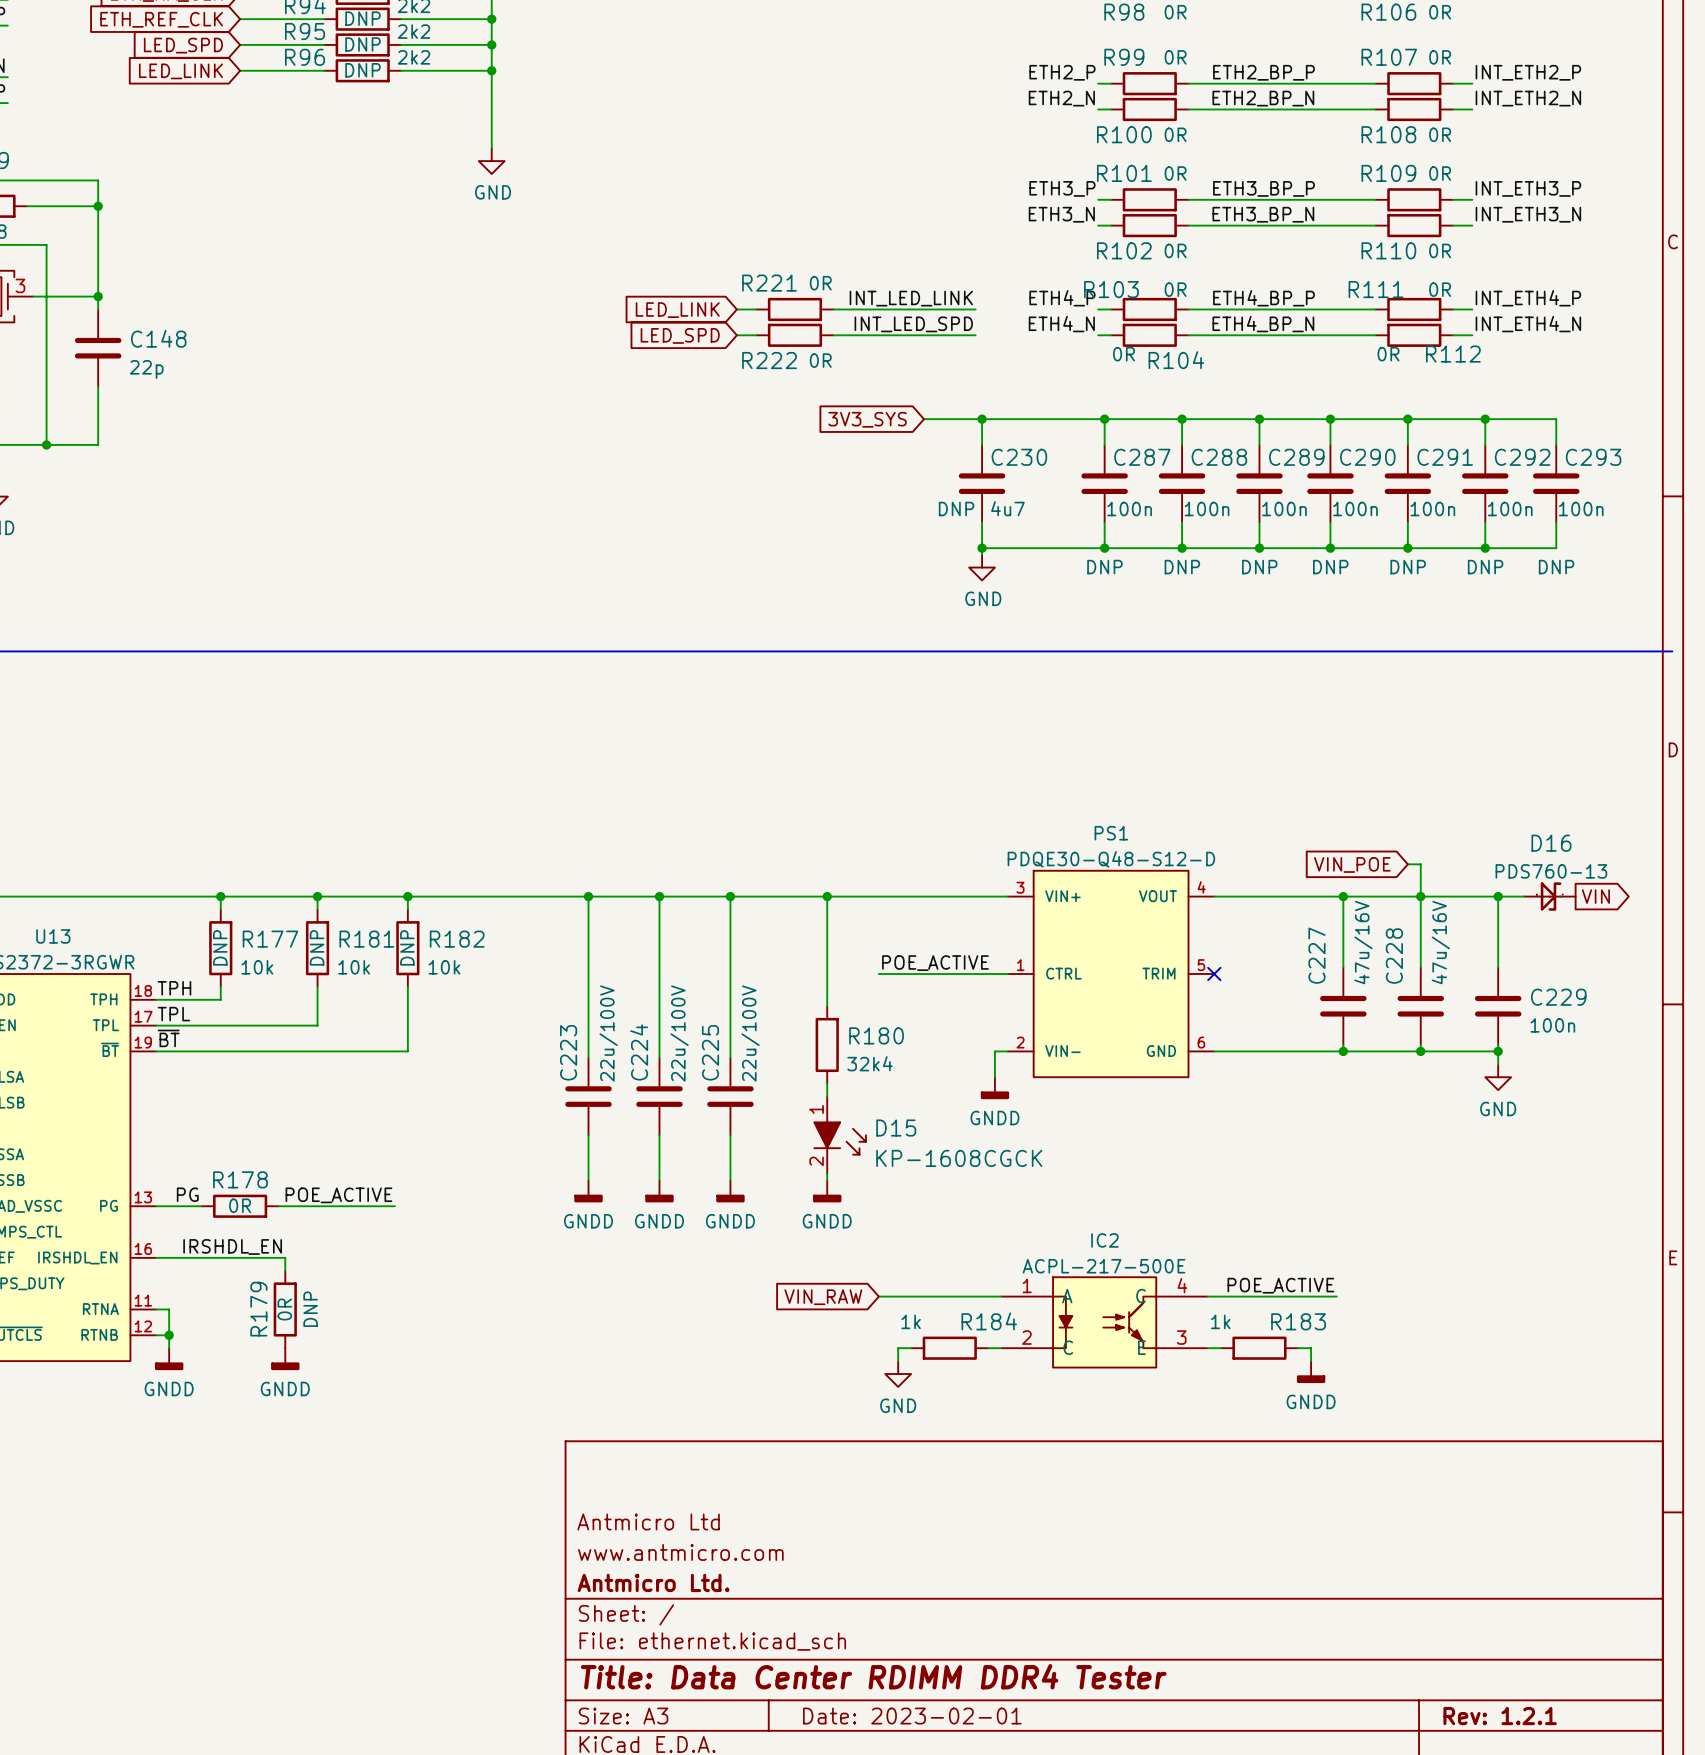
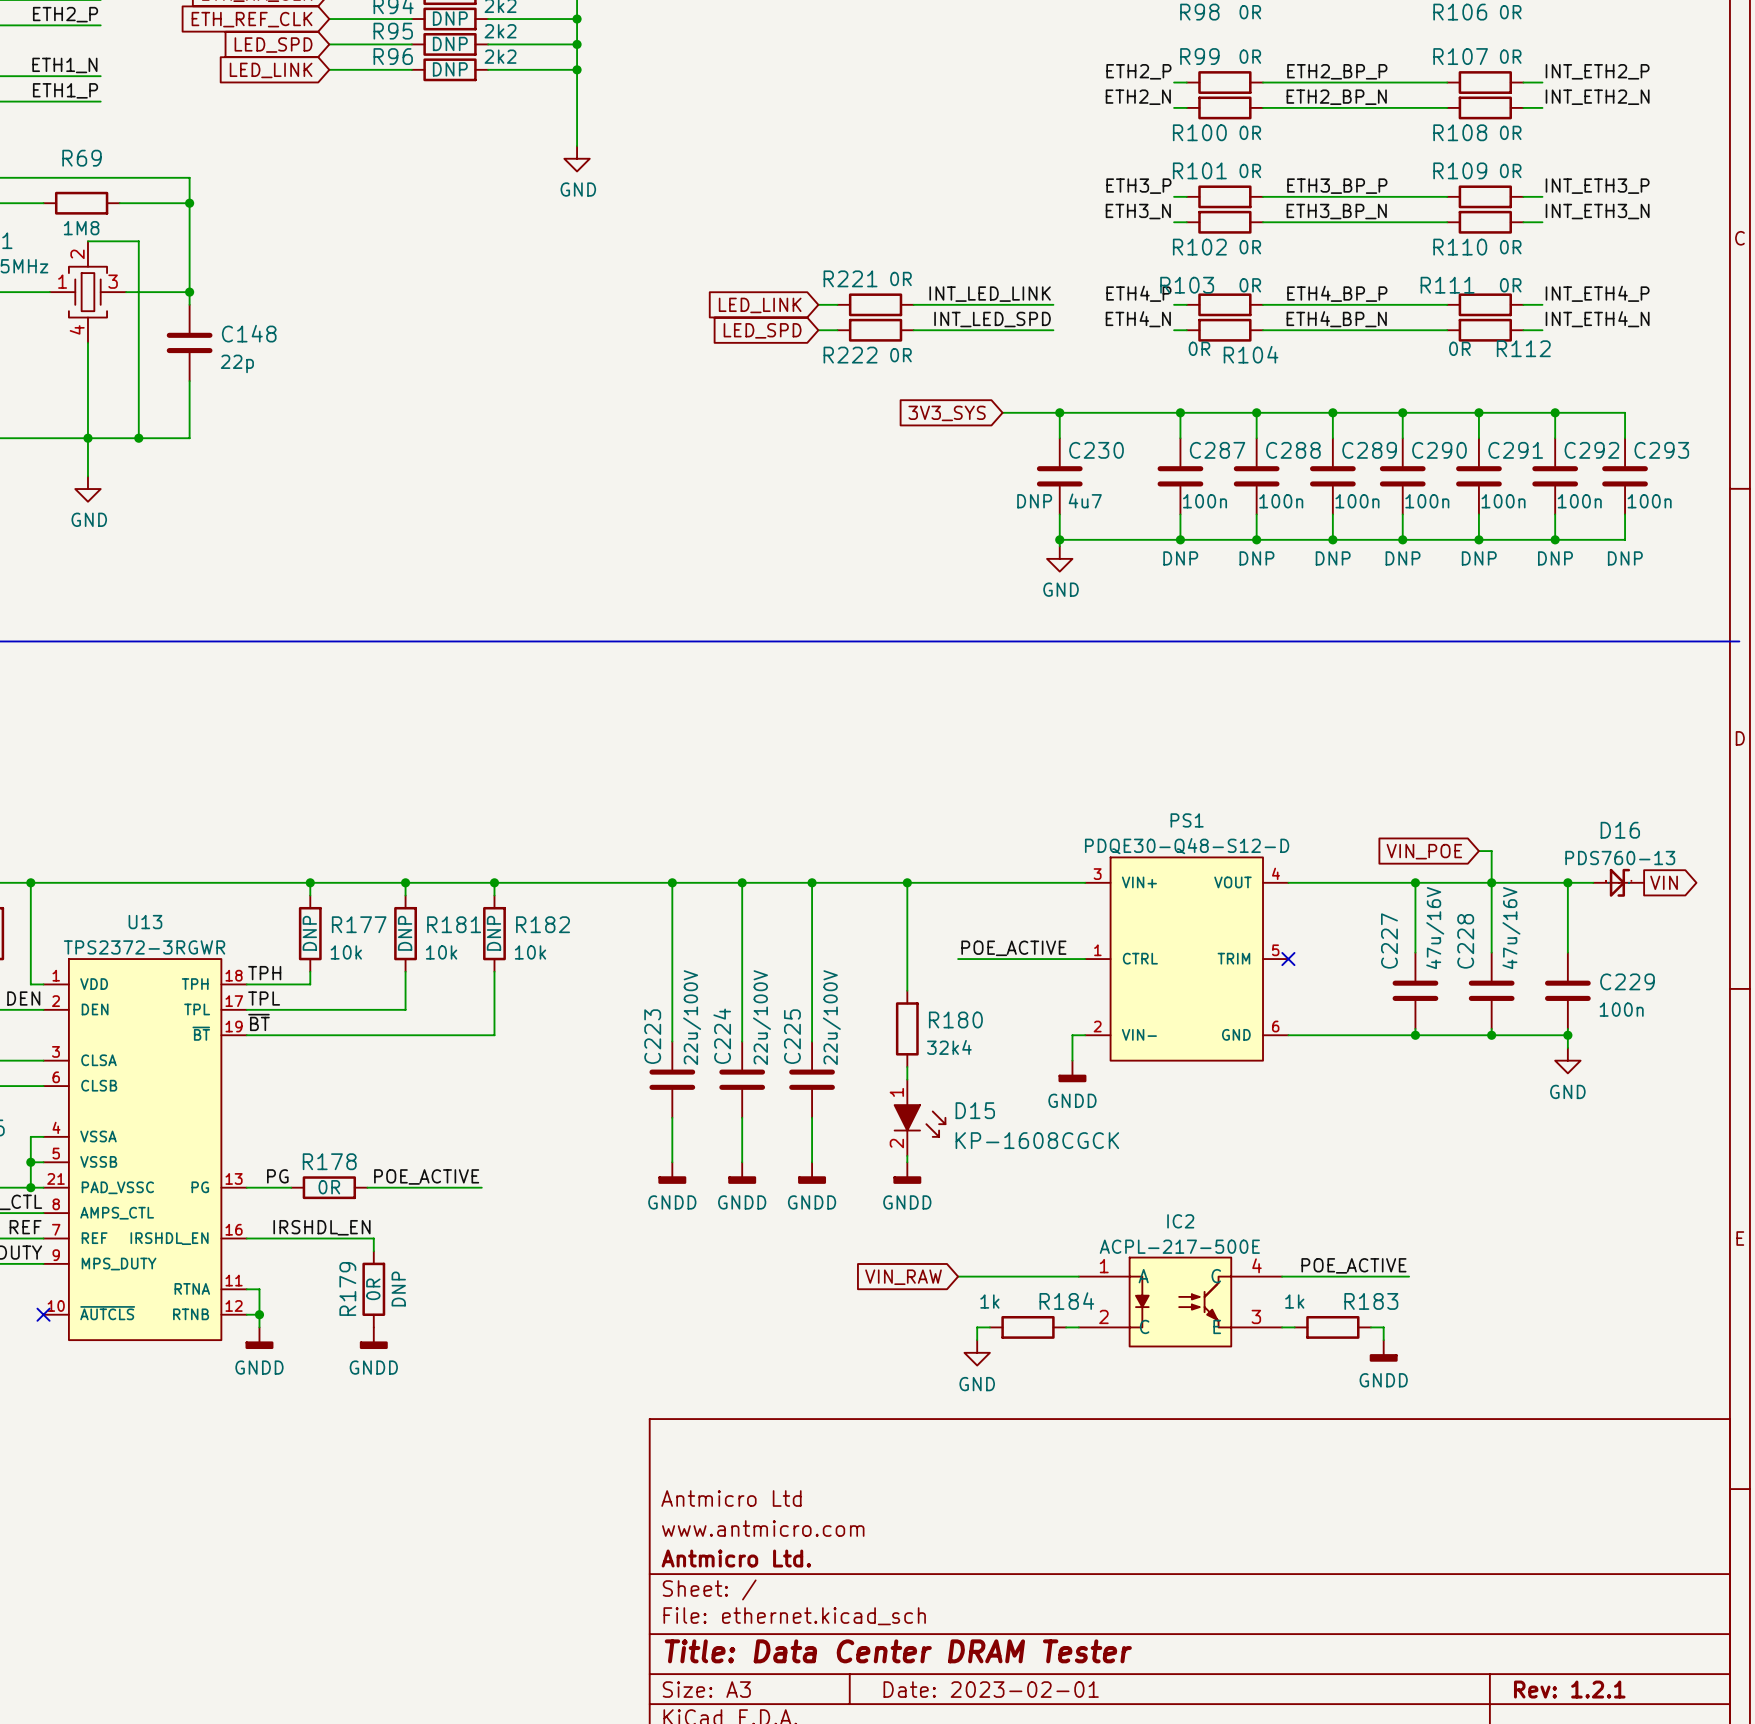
title block: Title: Data Center RDIMM DDR4 Tester (873, 1676) -> Title: Data Center DRAM Tester (898, 1651)

